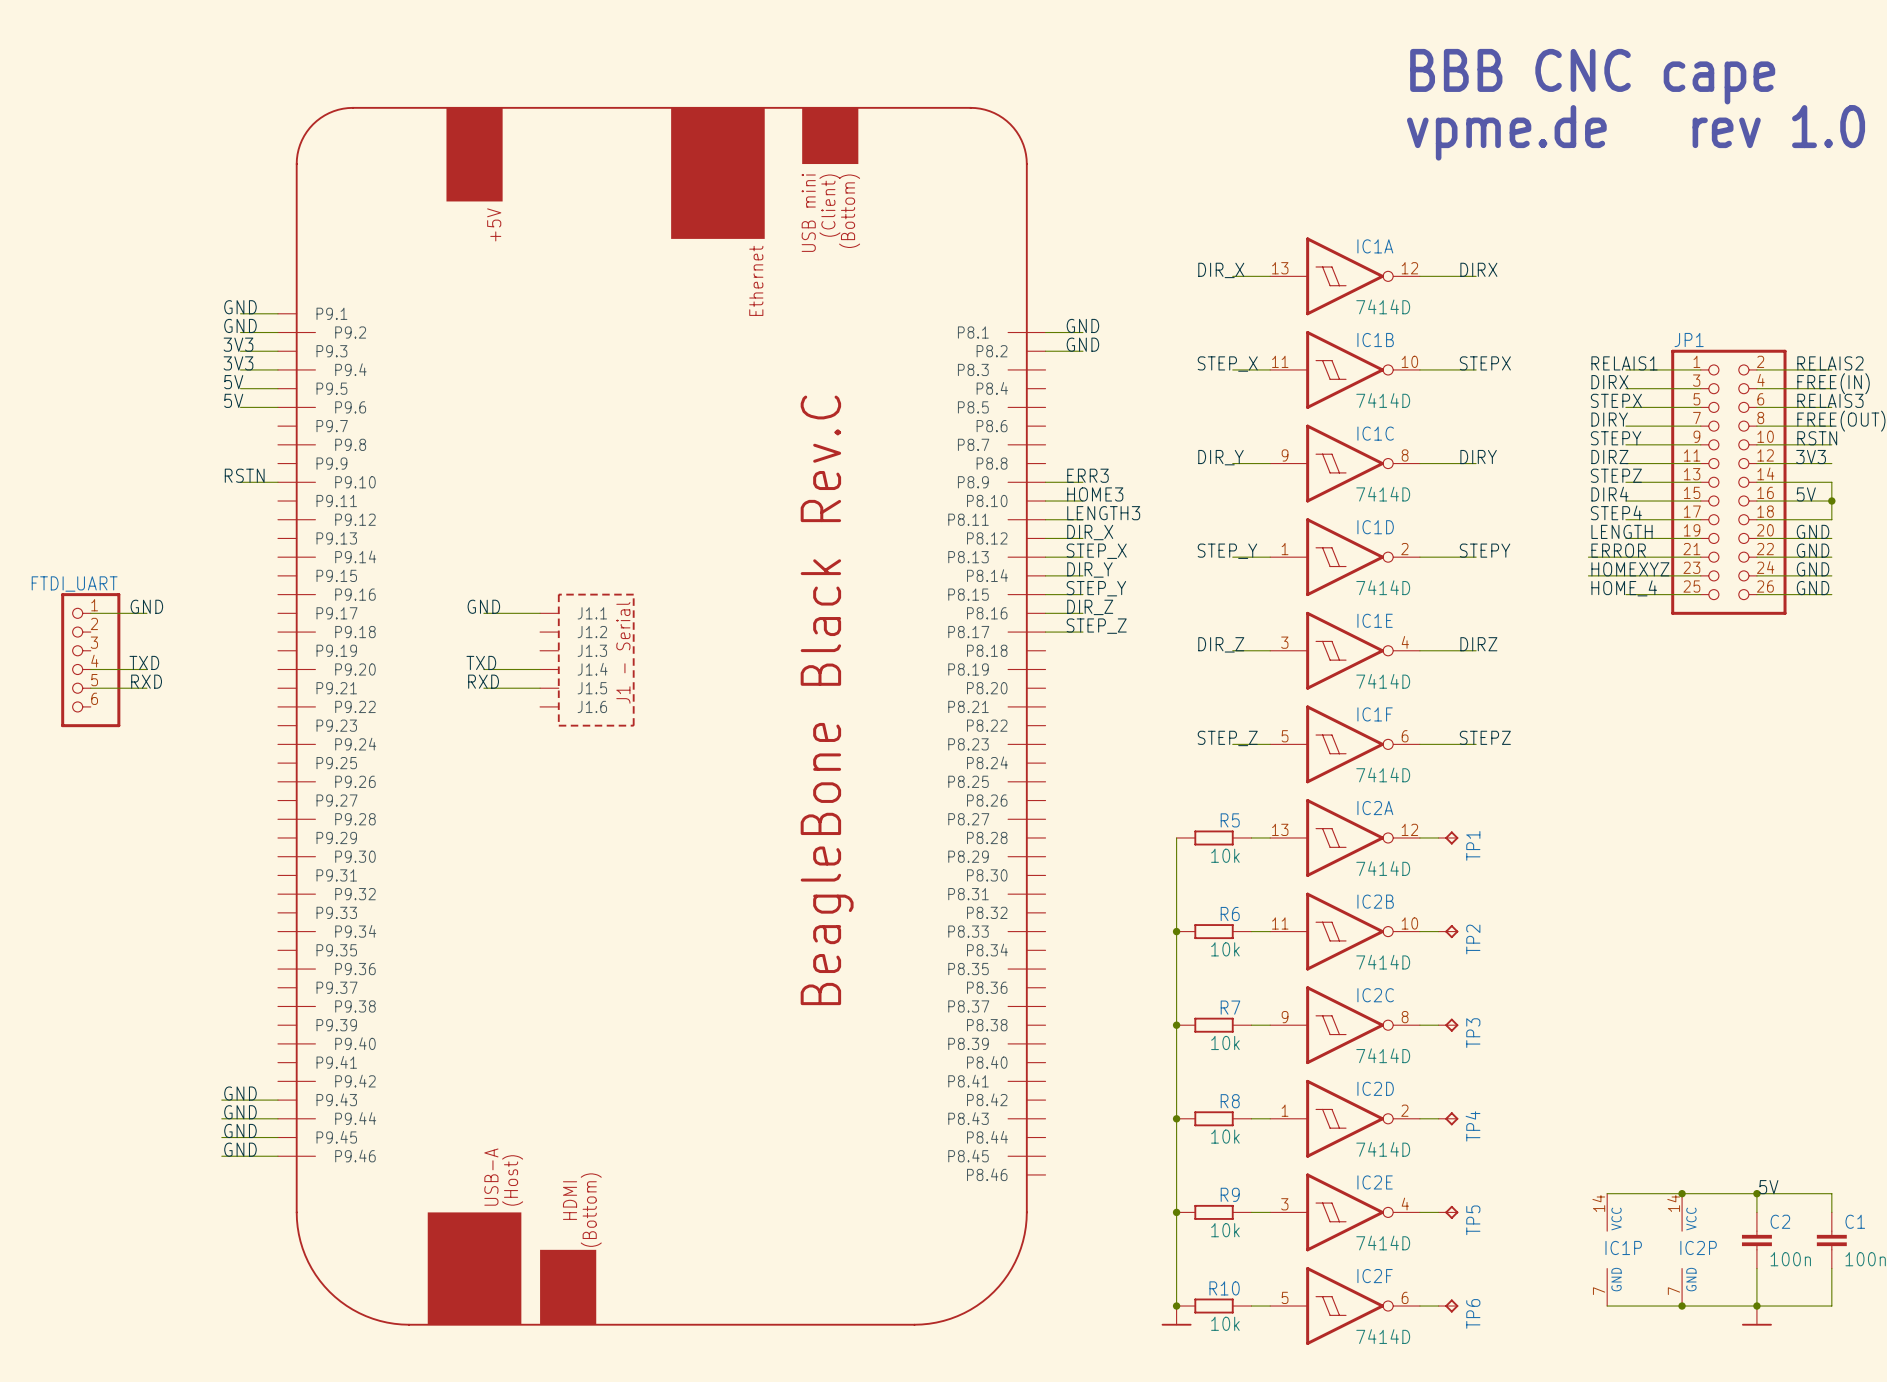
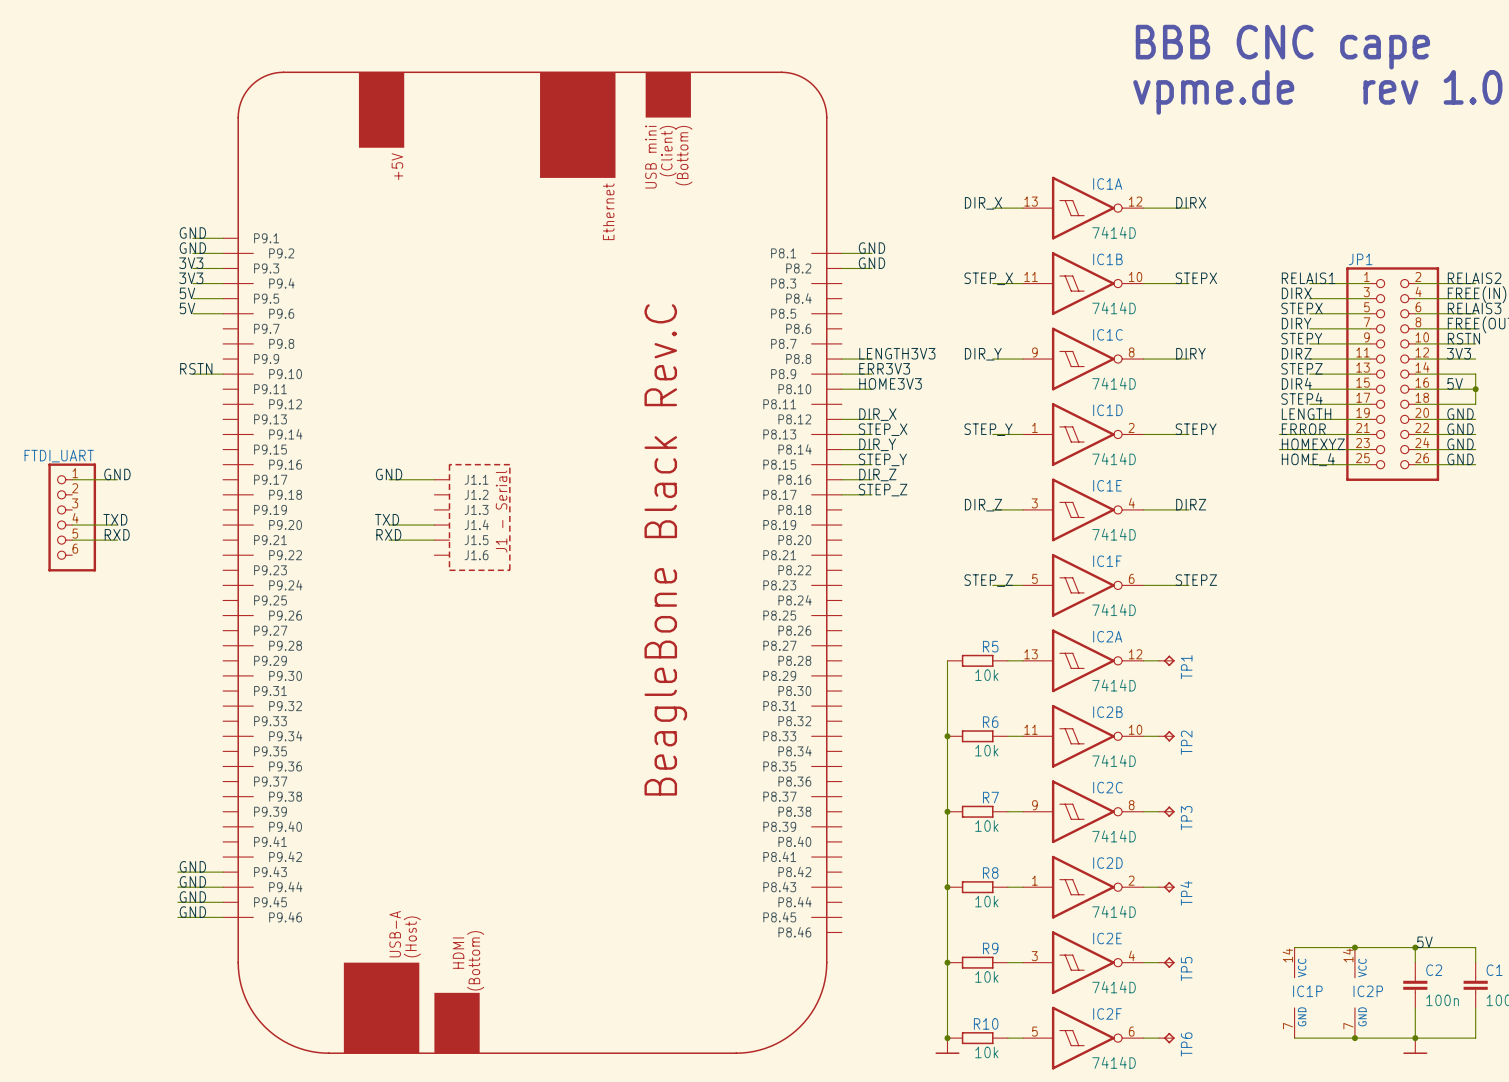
label: none -> LENGTH3V3 (897, 353)
label: ERR3 (1087, 475) -> ERR3V3 (884, 368)
label: HOME3 (1095, 494) -> HOME3V3 (890, 383)
label: LENGTH3 (1103, 513) -> none
wire: (1045, 519) (1082, 519) -> (841, 359) (872, 359)

